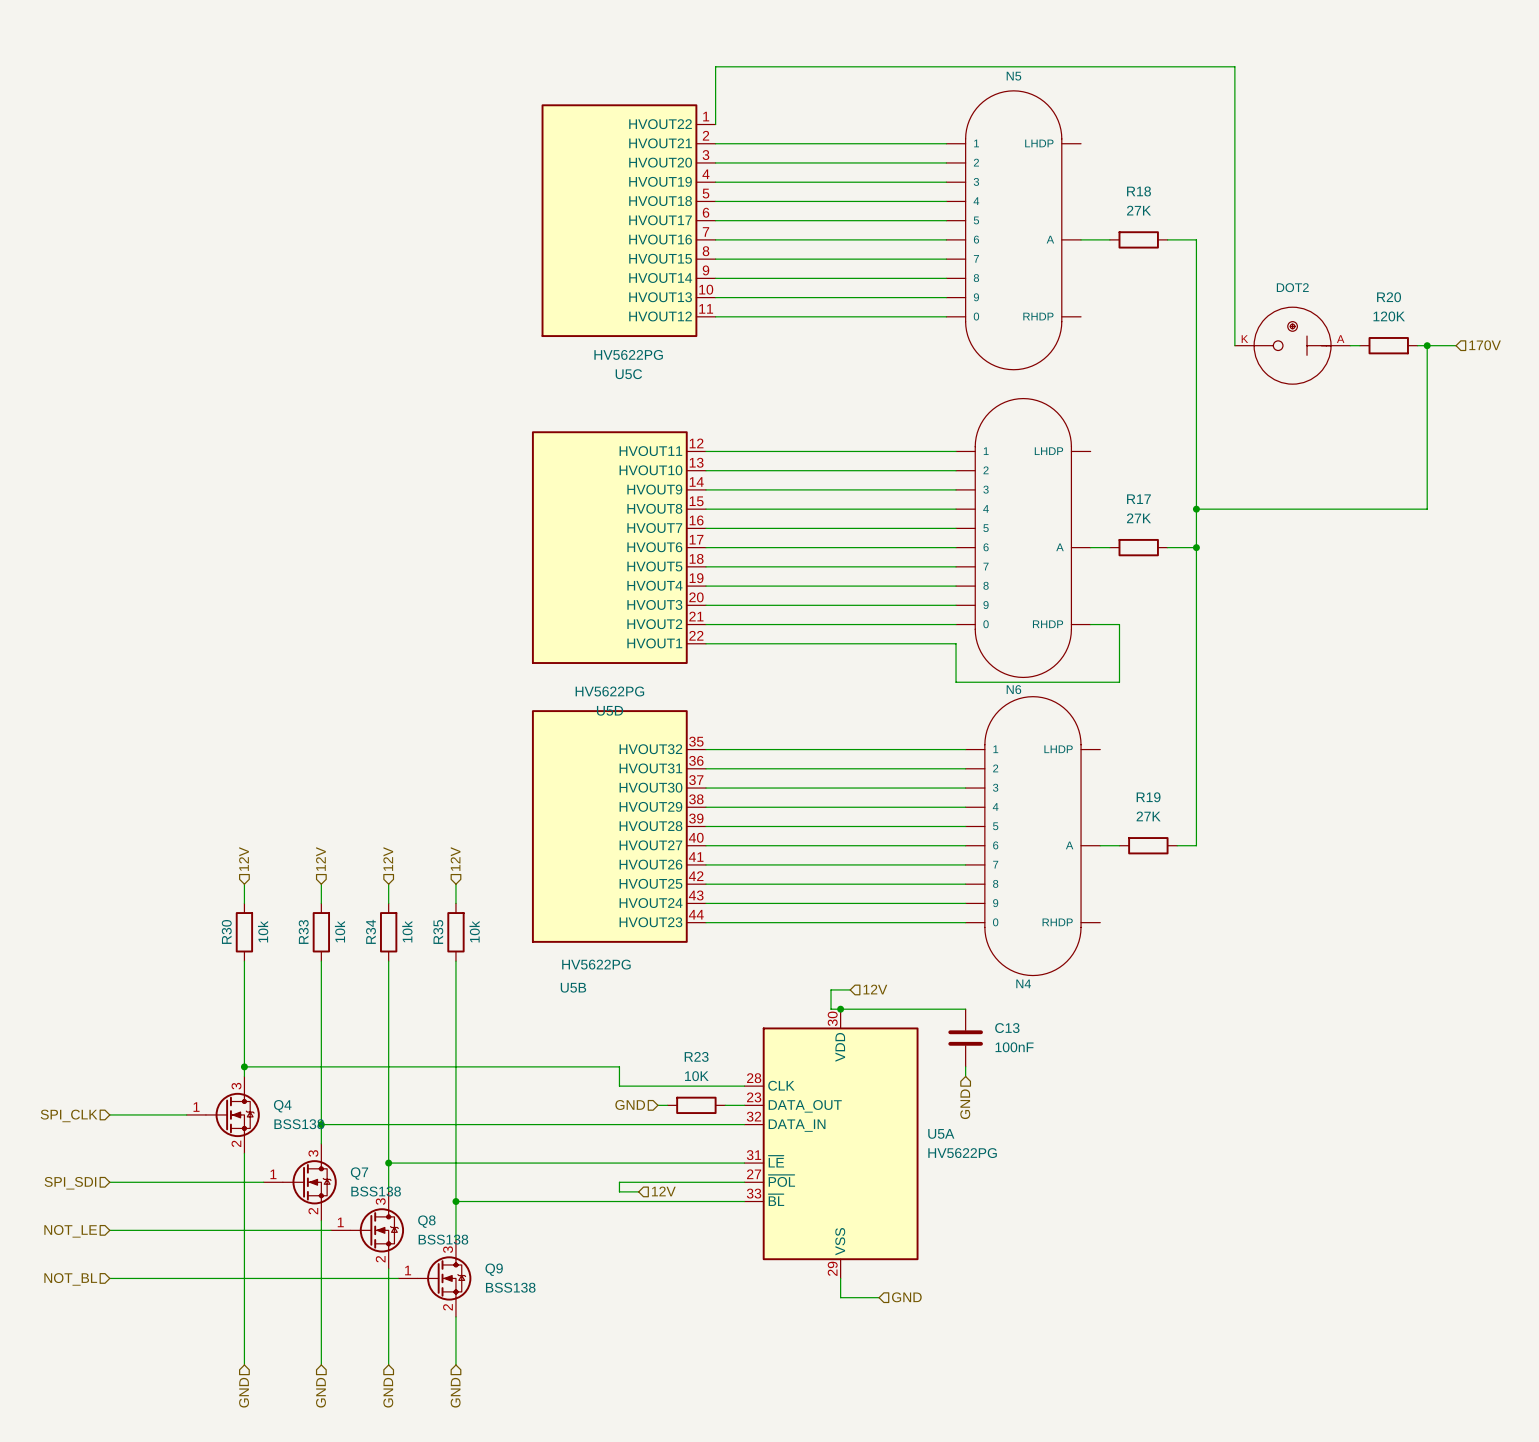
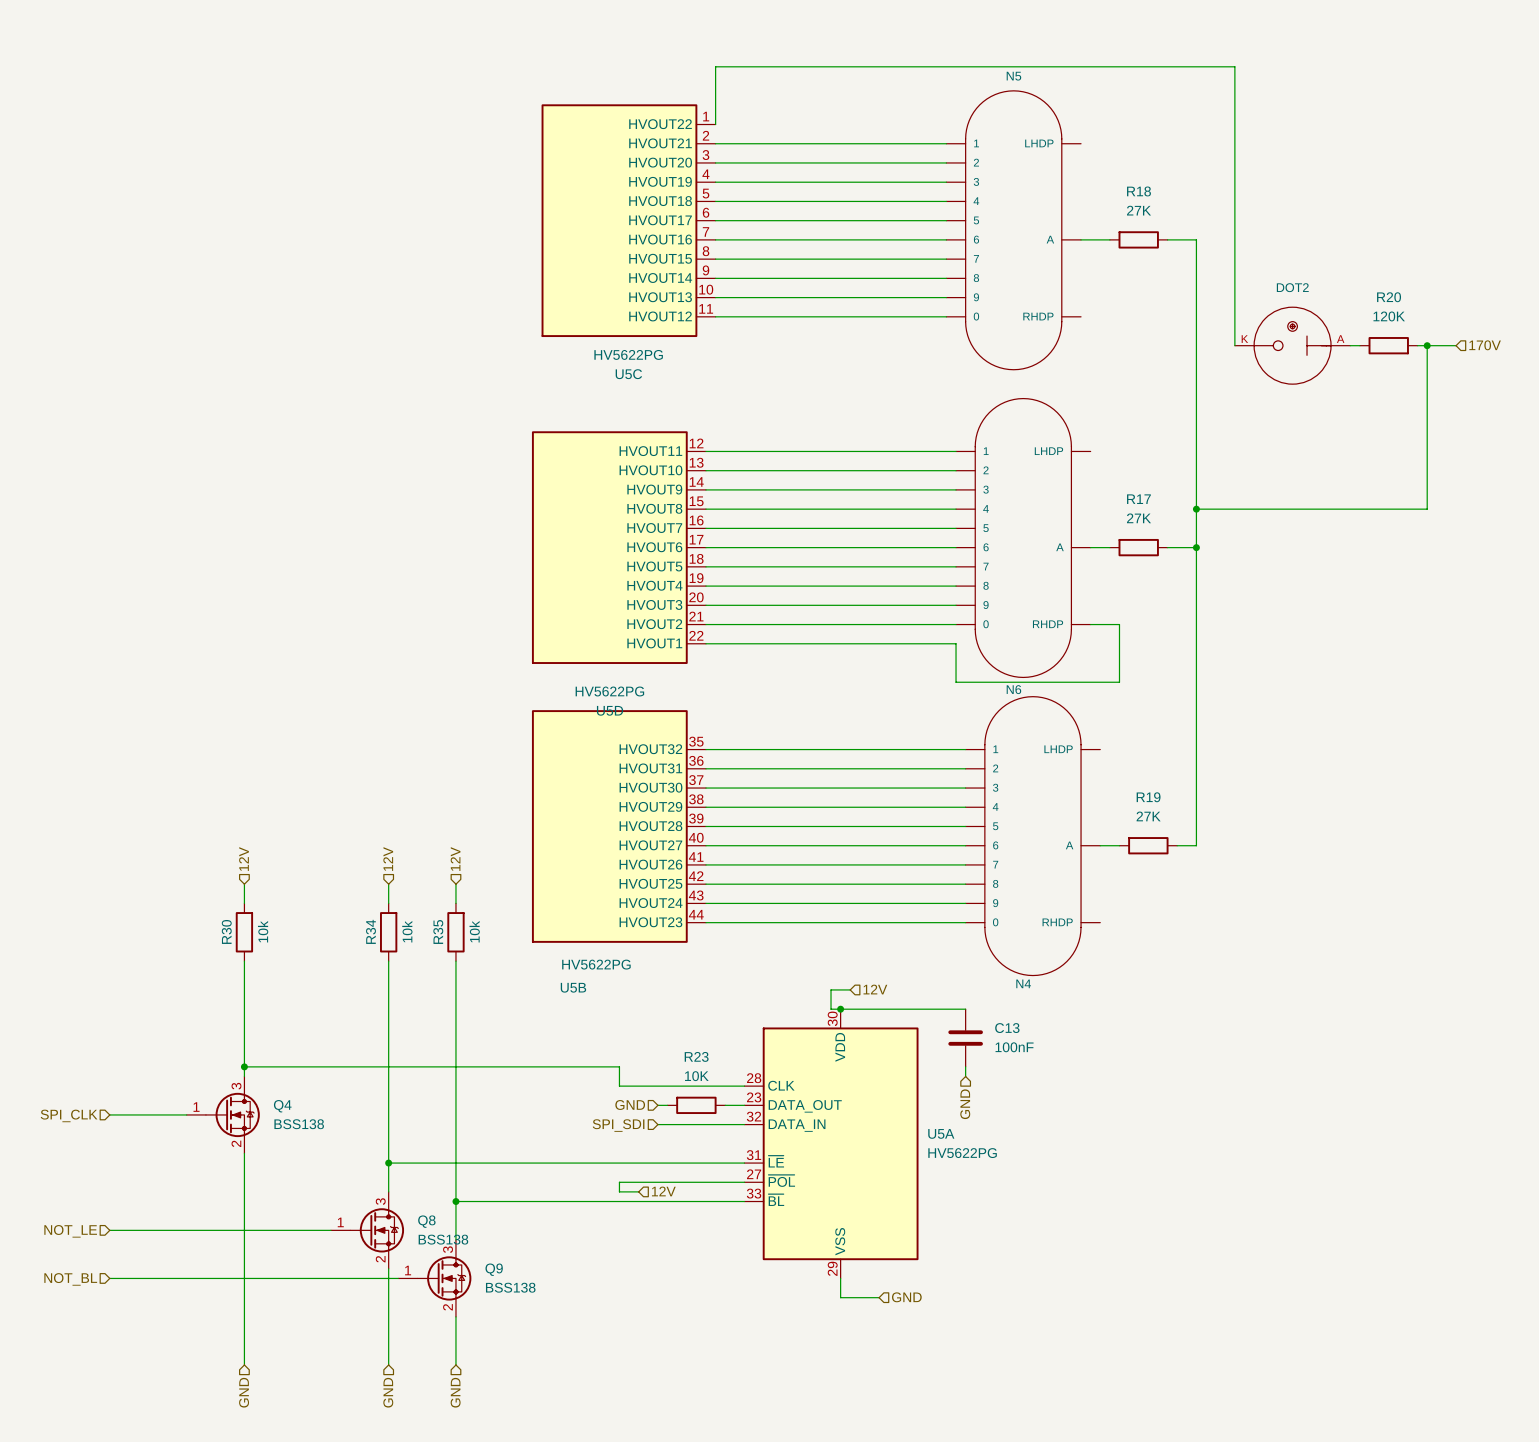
hierarchical label: 12V (320, 859) -> none
wire: (321, 884) (321, 903) -> none
R33: 10k (321, 932) -> none
wire: (321, 961) (321, 1143) -> none
wire: (321, 1124) (657, 1124) -> none
junction: (321, 1124) -> none
hierarchical label: none -> SPI_SDI (618, 1125)
wire: (109, 1182) (263, 1182) -> none
Q7: BSS138 (300, 1182) -> none
hierarchical label: SPI_SDI (70, 1183) -> none
wire: (321, 1220) (321, 1364) -> none
hierarchical label: GND (320, 1392) -> none

